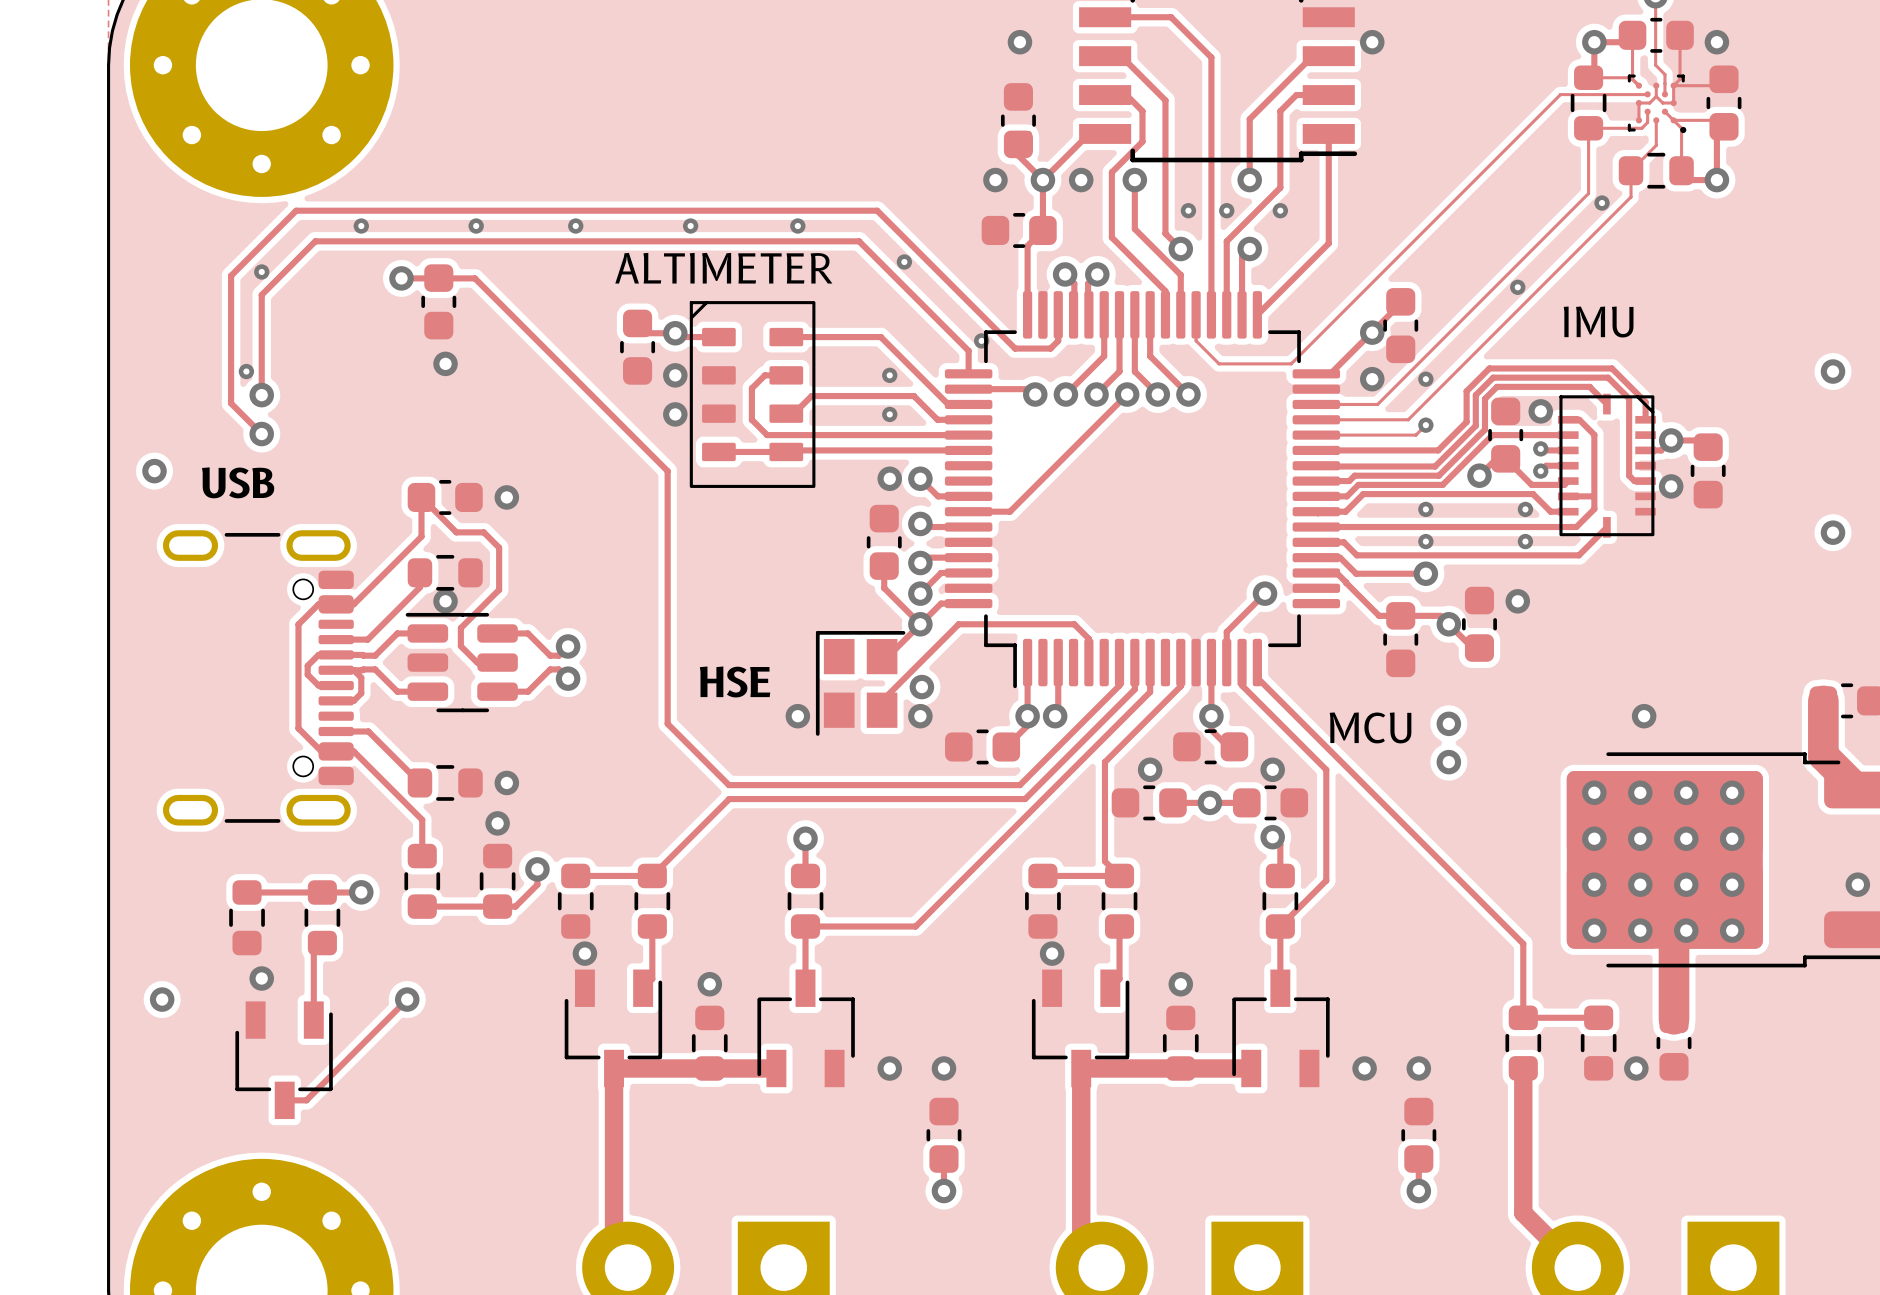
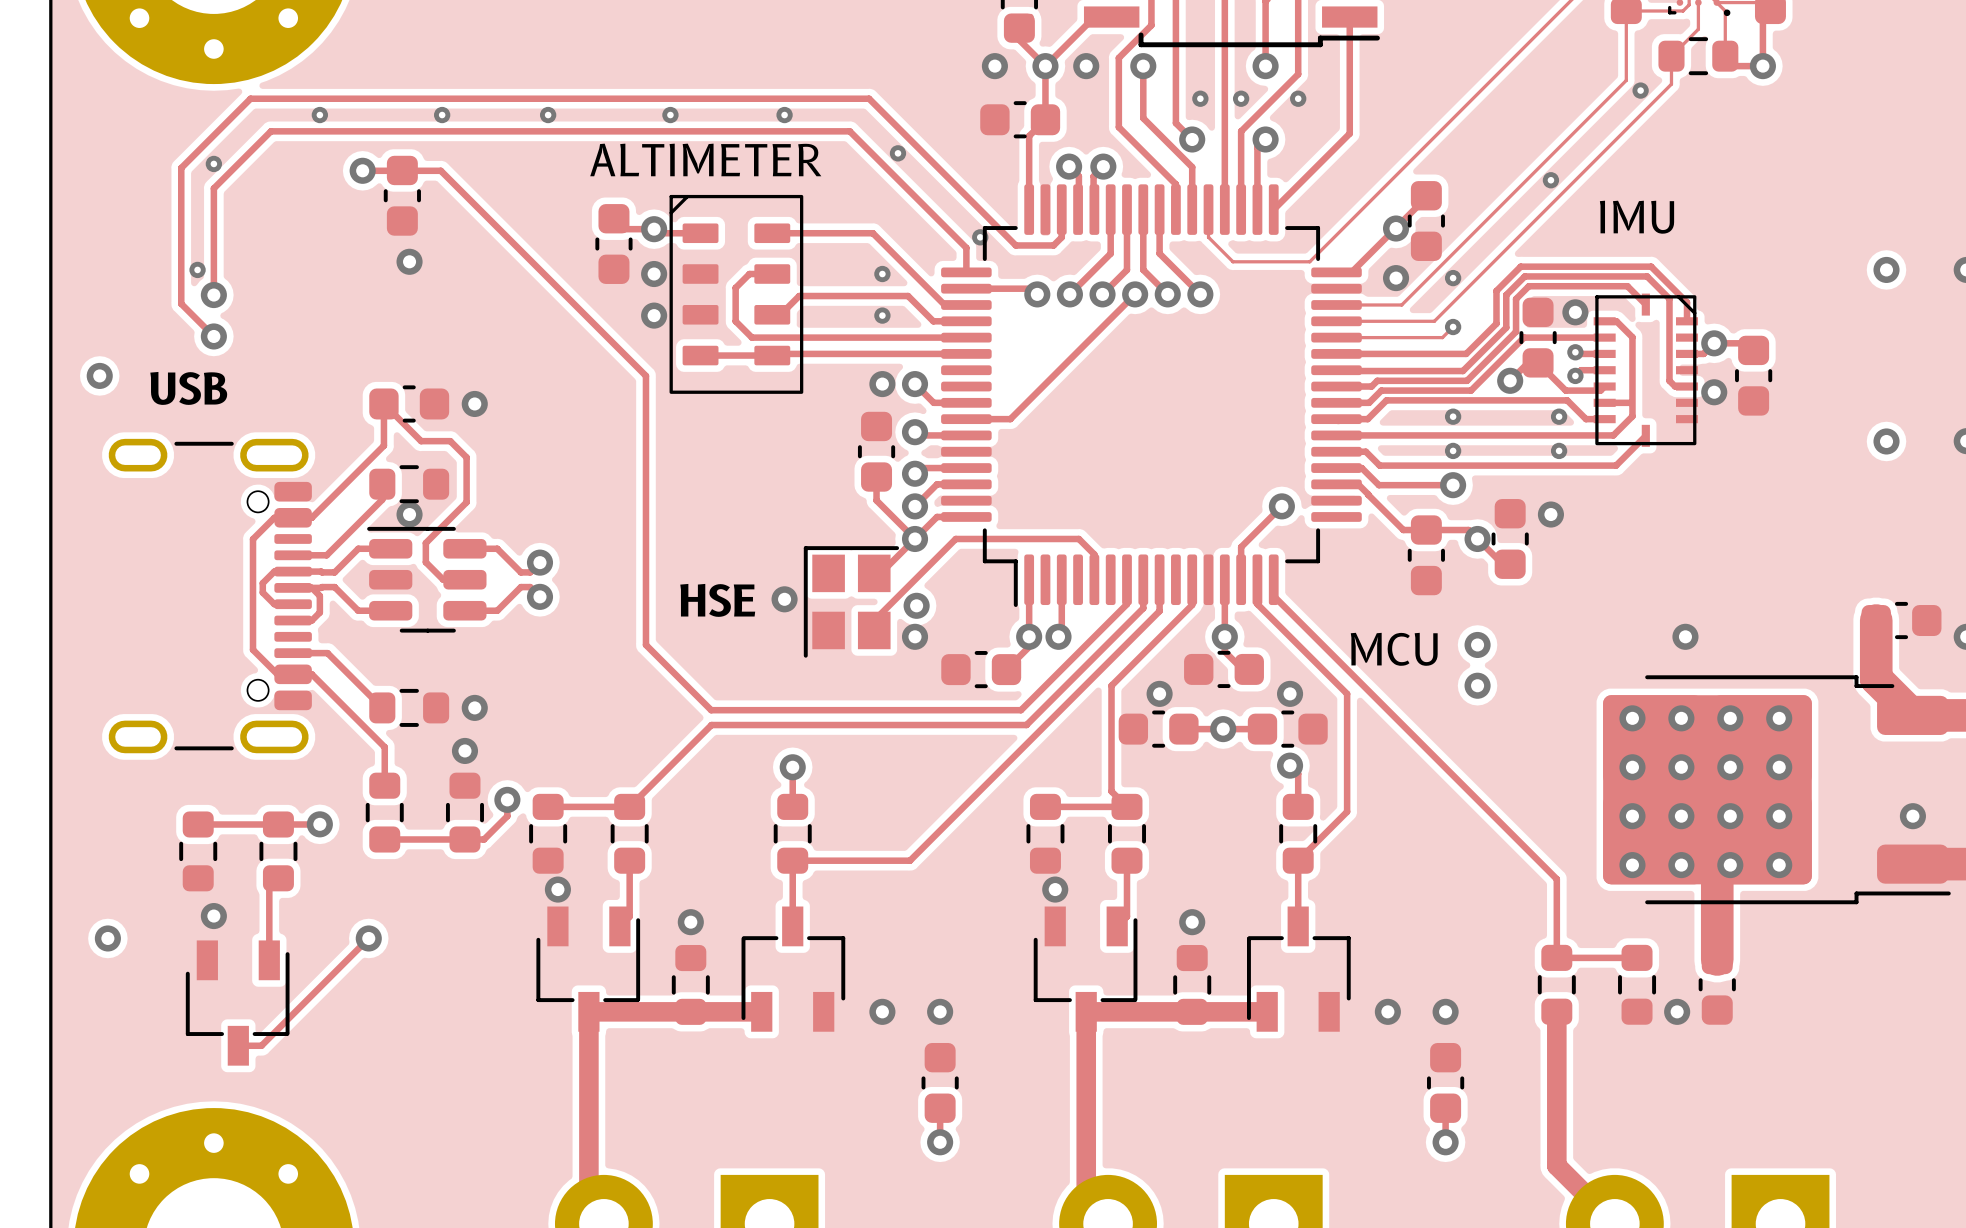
via position: (797, 716) -> (784, 599)

